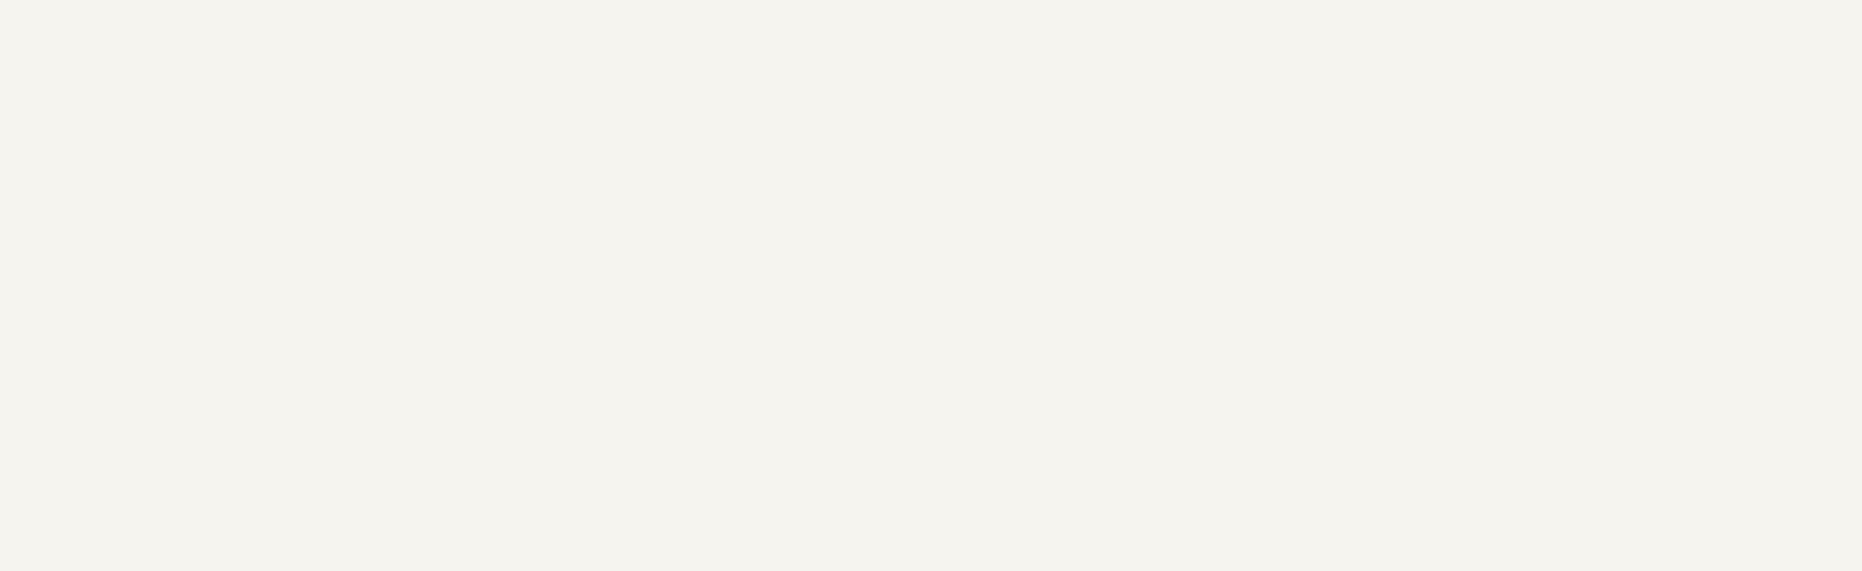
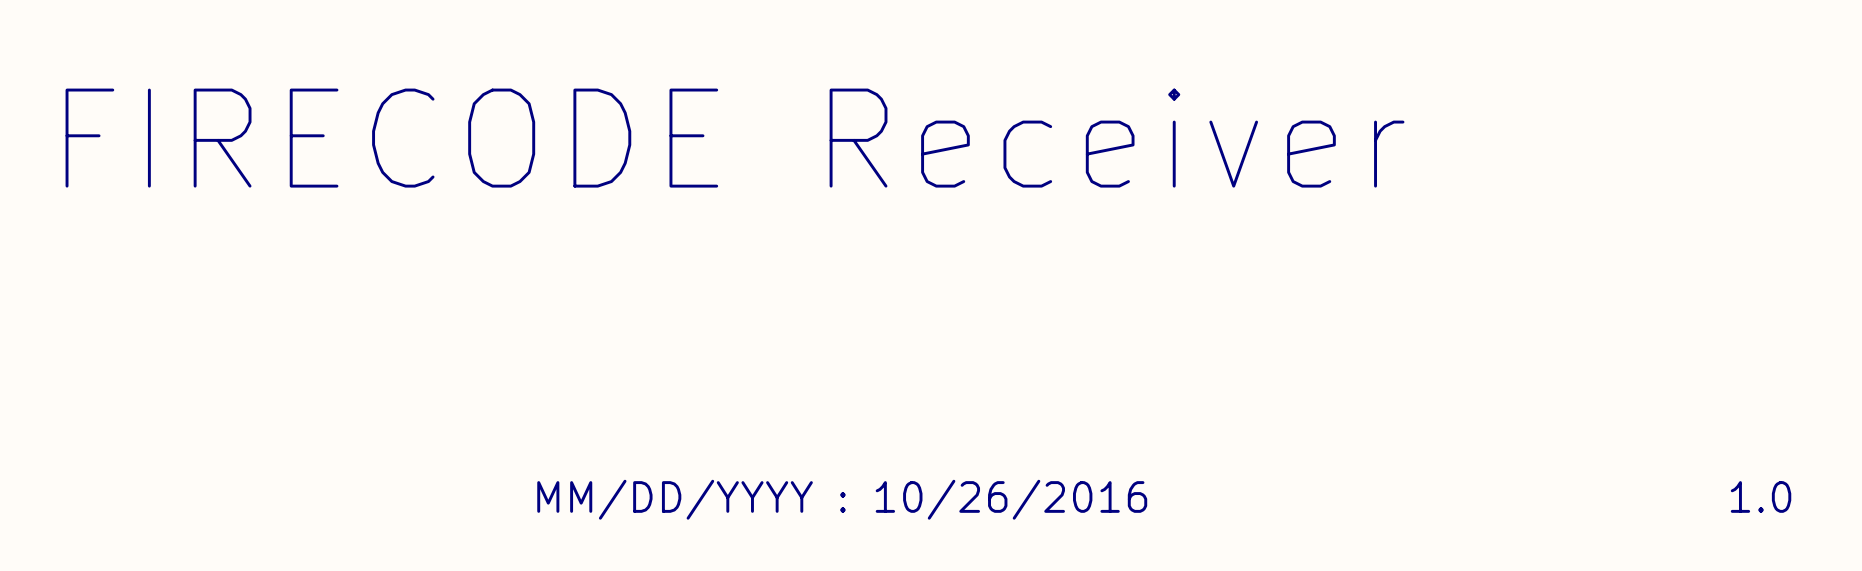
text: none -> FIRECODE Receiver (735, 138)
text: none -> 1.0 (1761, 496)
text: none -> MM/DD/YYYY : 10/26/2016 (842, 499)

